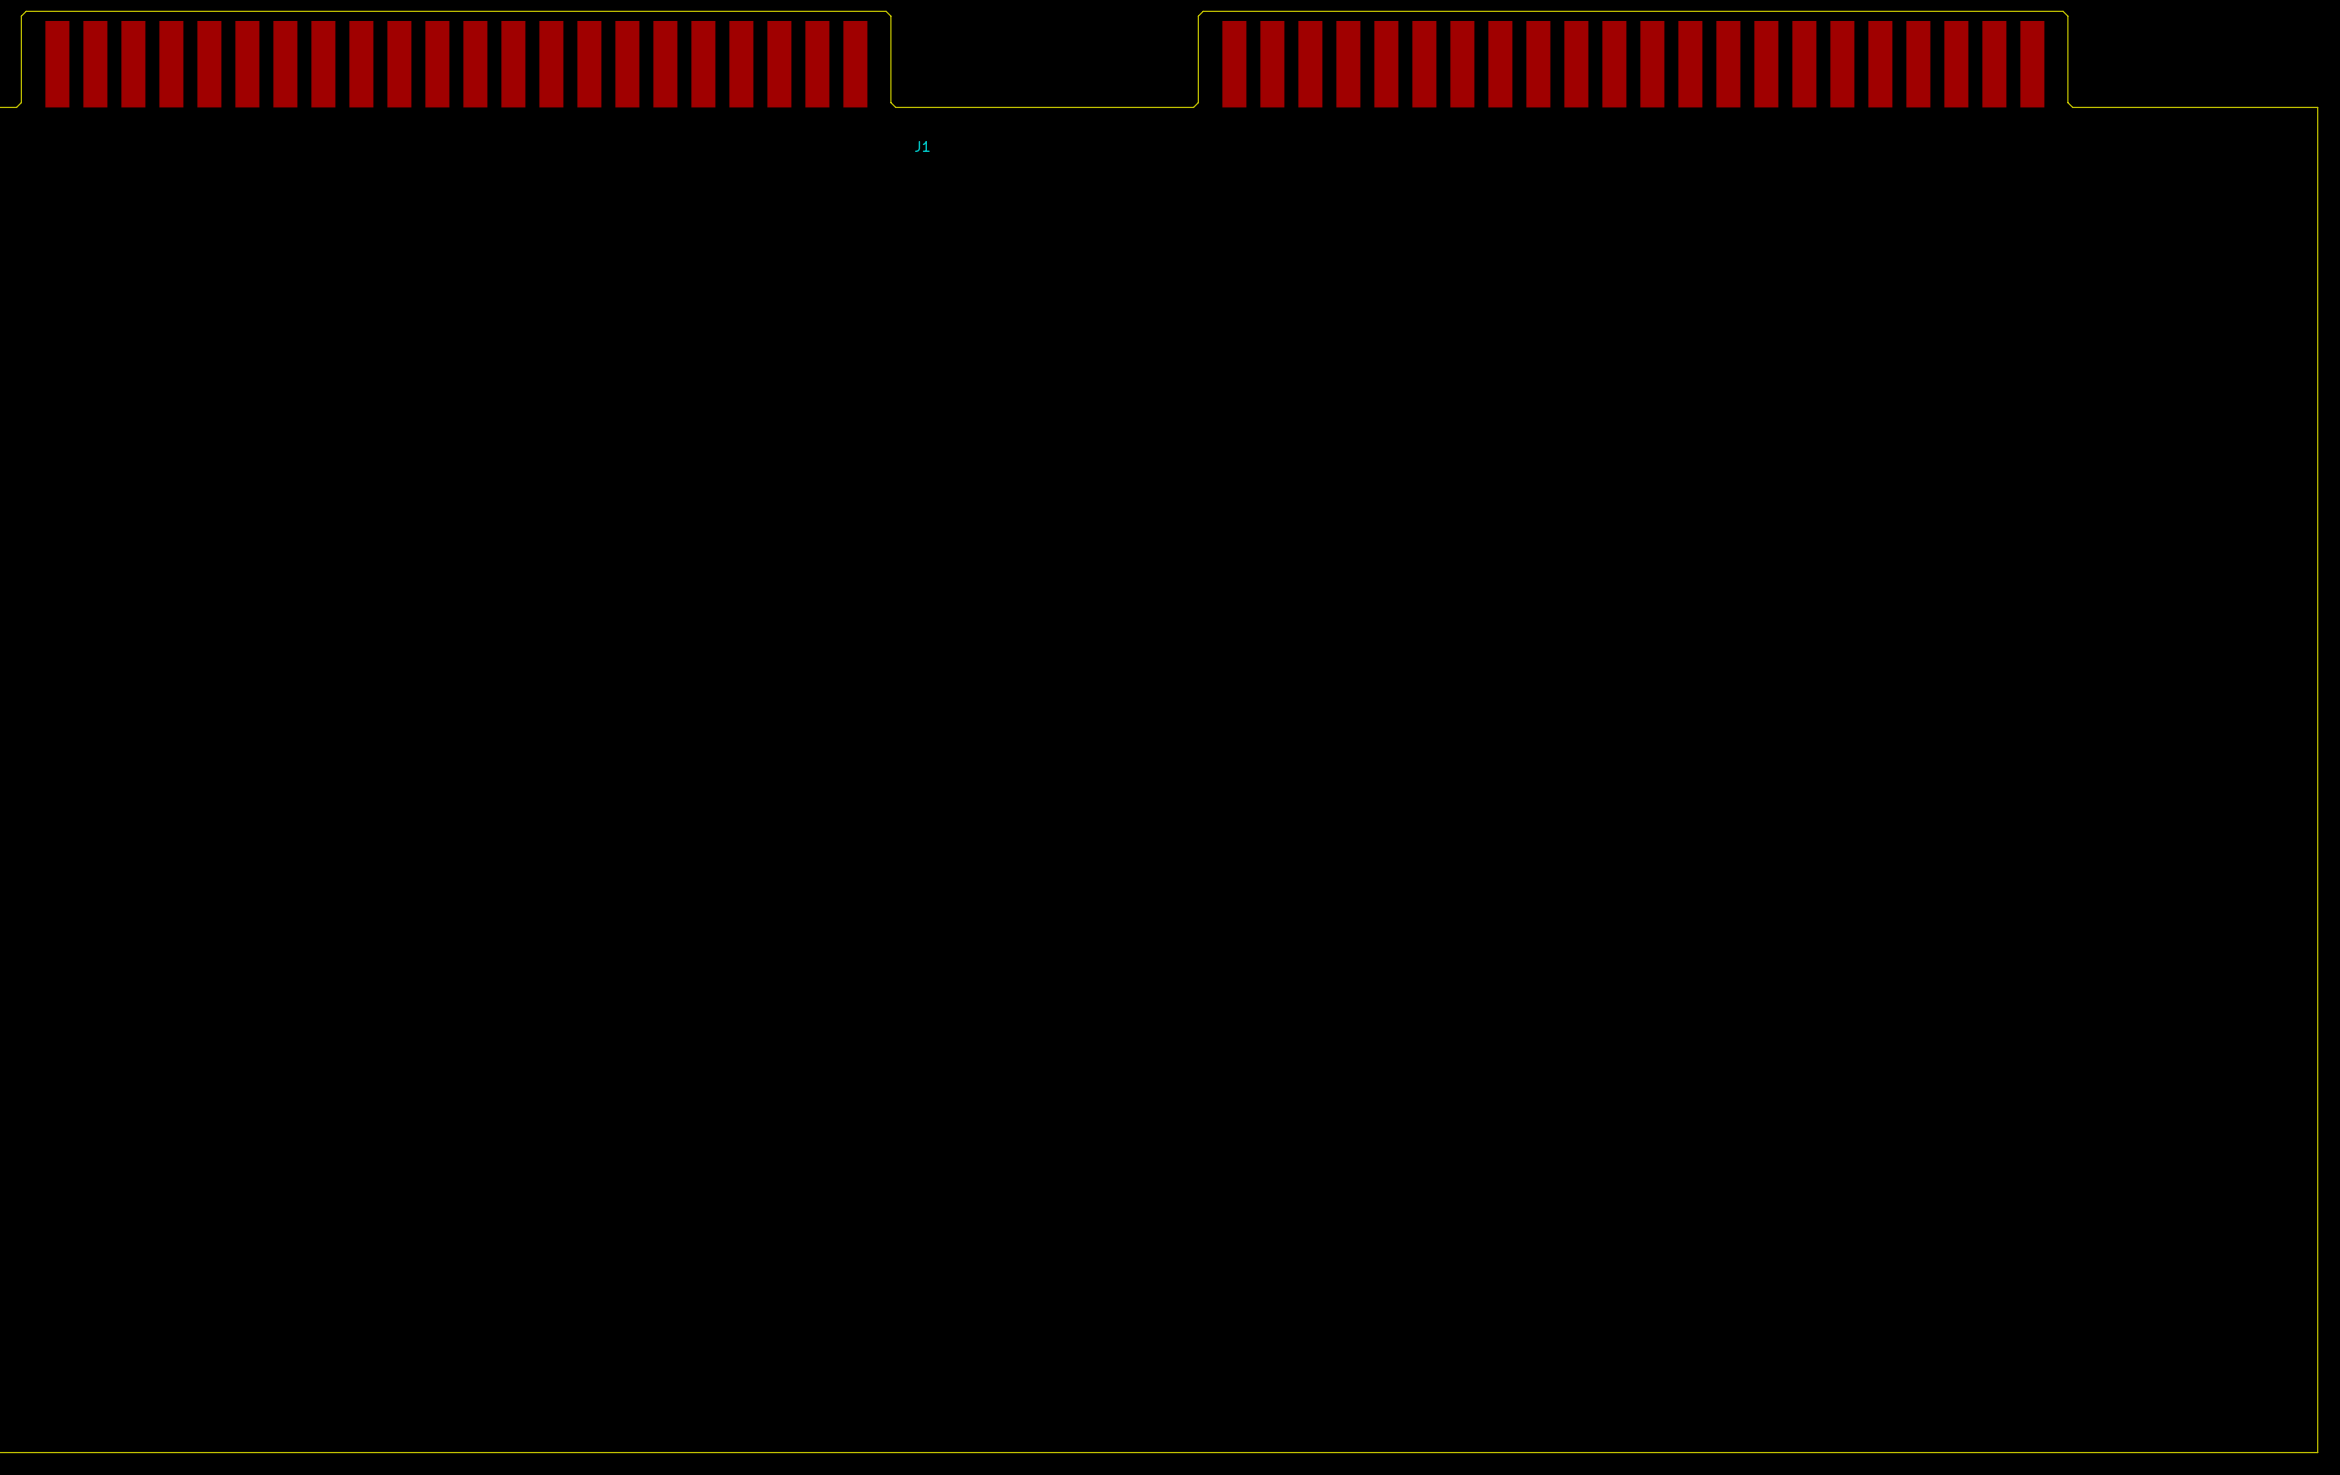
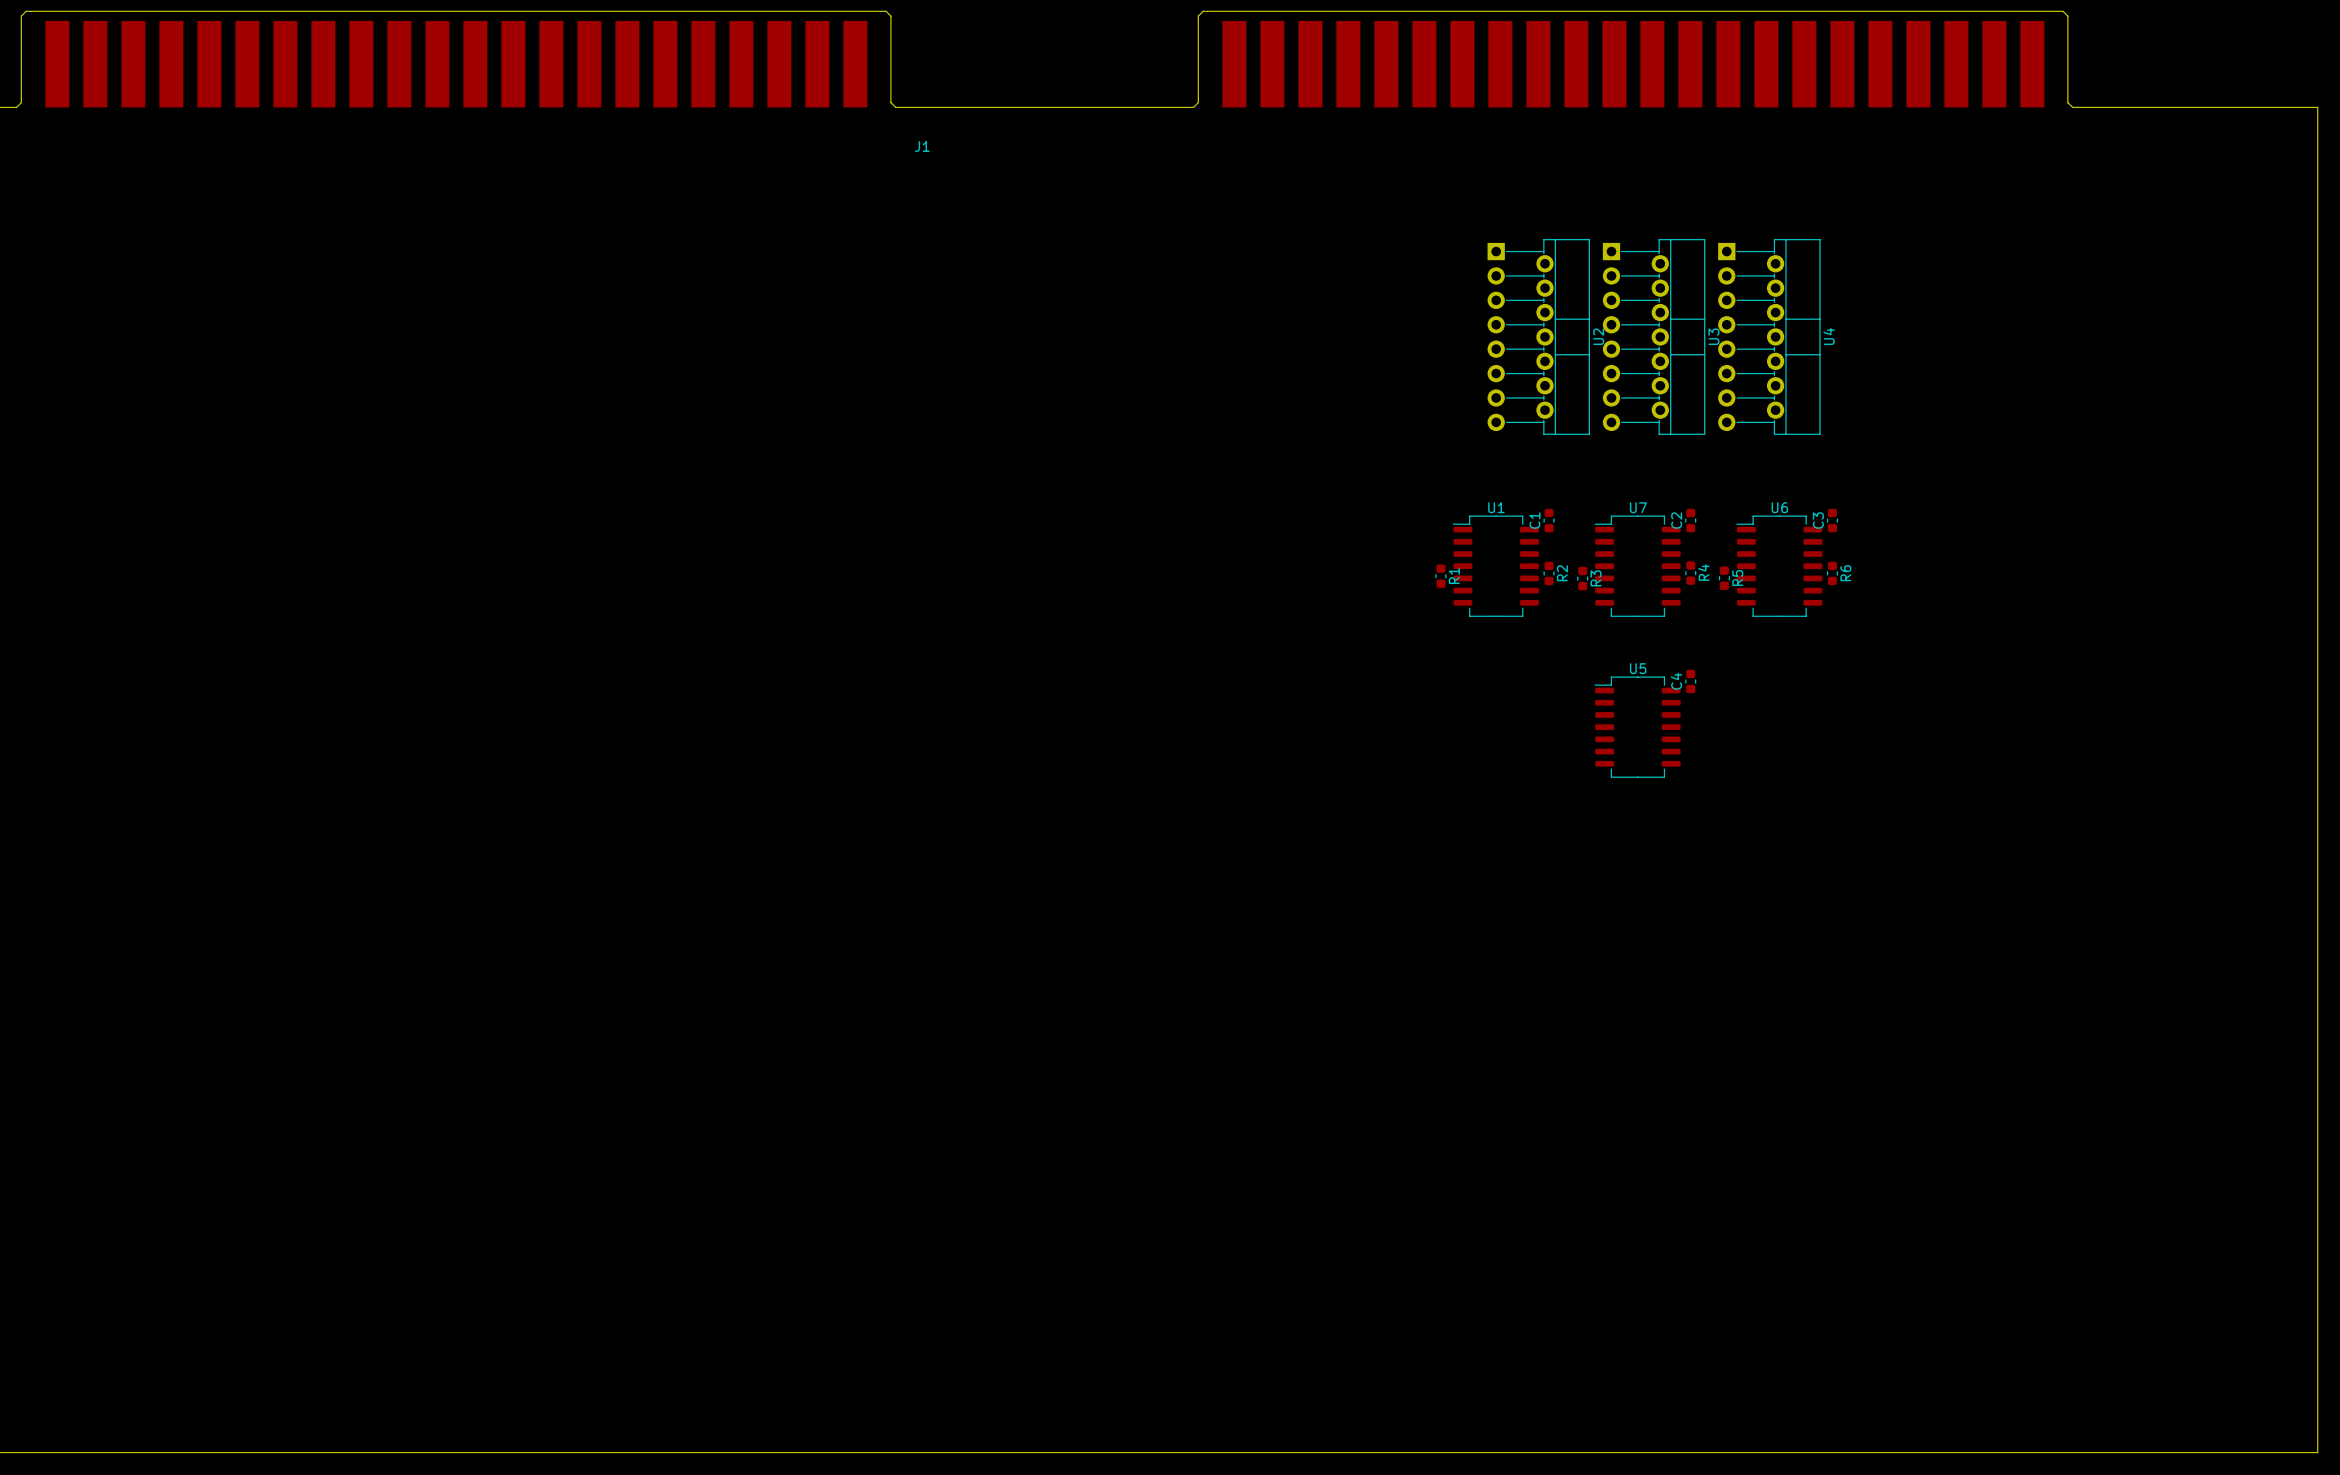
U2: none -> (1538, 336)
U3: none -> (1654, 336)
U4: none -> (1769, 336)
C1: none -> (1549, 520)
C2: none -> (1690, 520)
C3: none -> (1832, 520)
U1: none -> (1495, 566)
U7: none -> (1637, 566)
U6: none -> (1779, 566)
R2: none -> (1549, 573)
R4: none -> (1690, 573)
R6: none -> (1832, 573)
R1: none -> (1440, 576)
R3: none -> (1582, 578)
R5: none -> (1724, 578)
C4: none -> (1690, 681)
U5: none -> (1637, 727)

